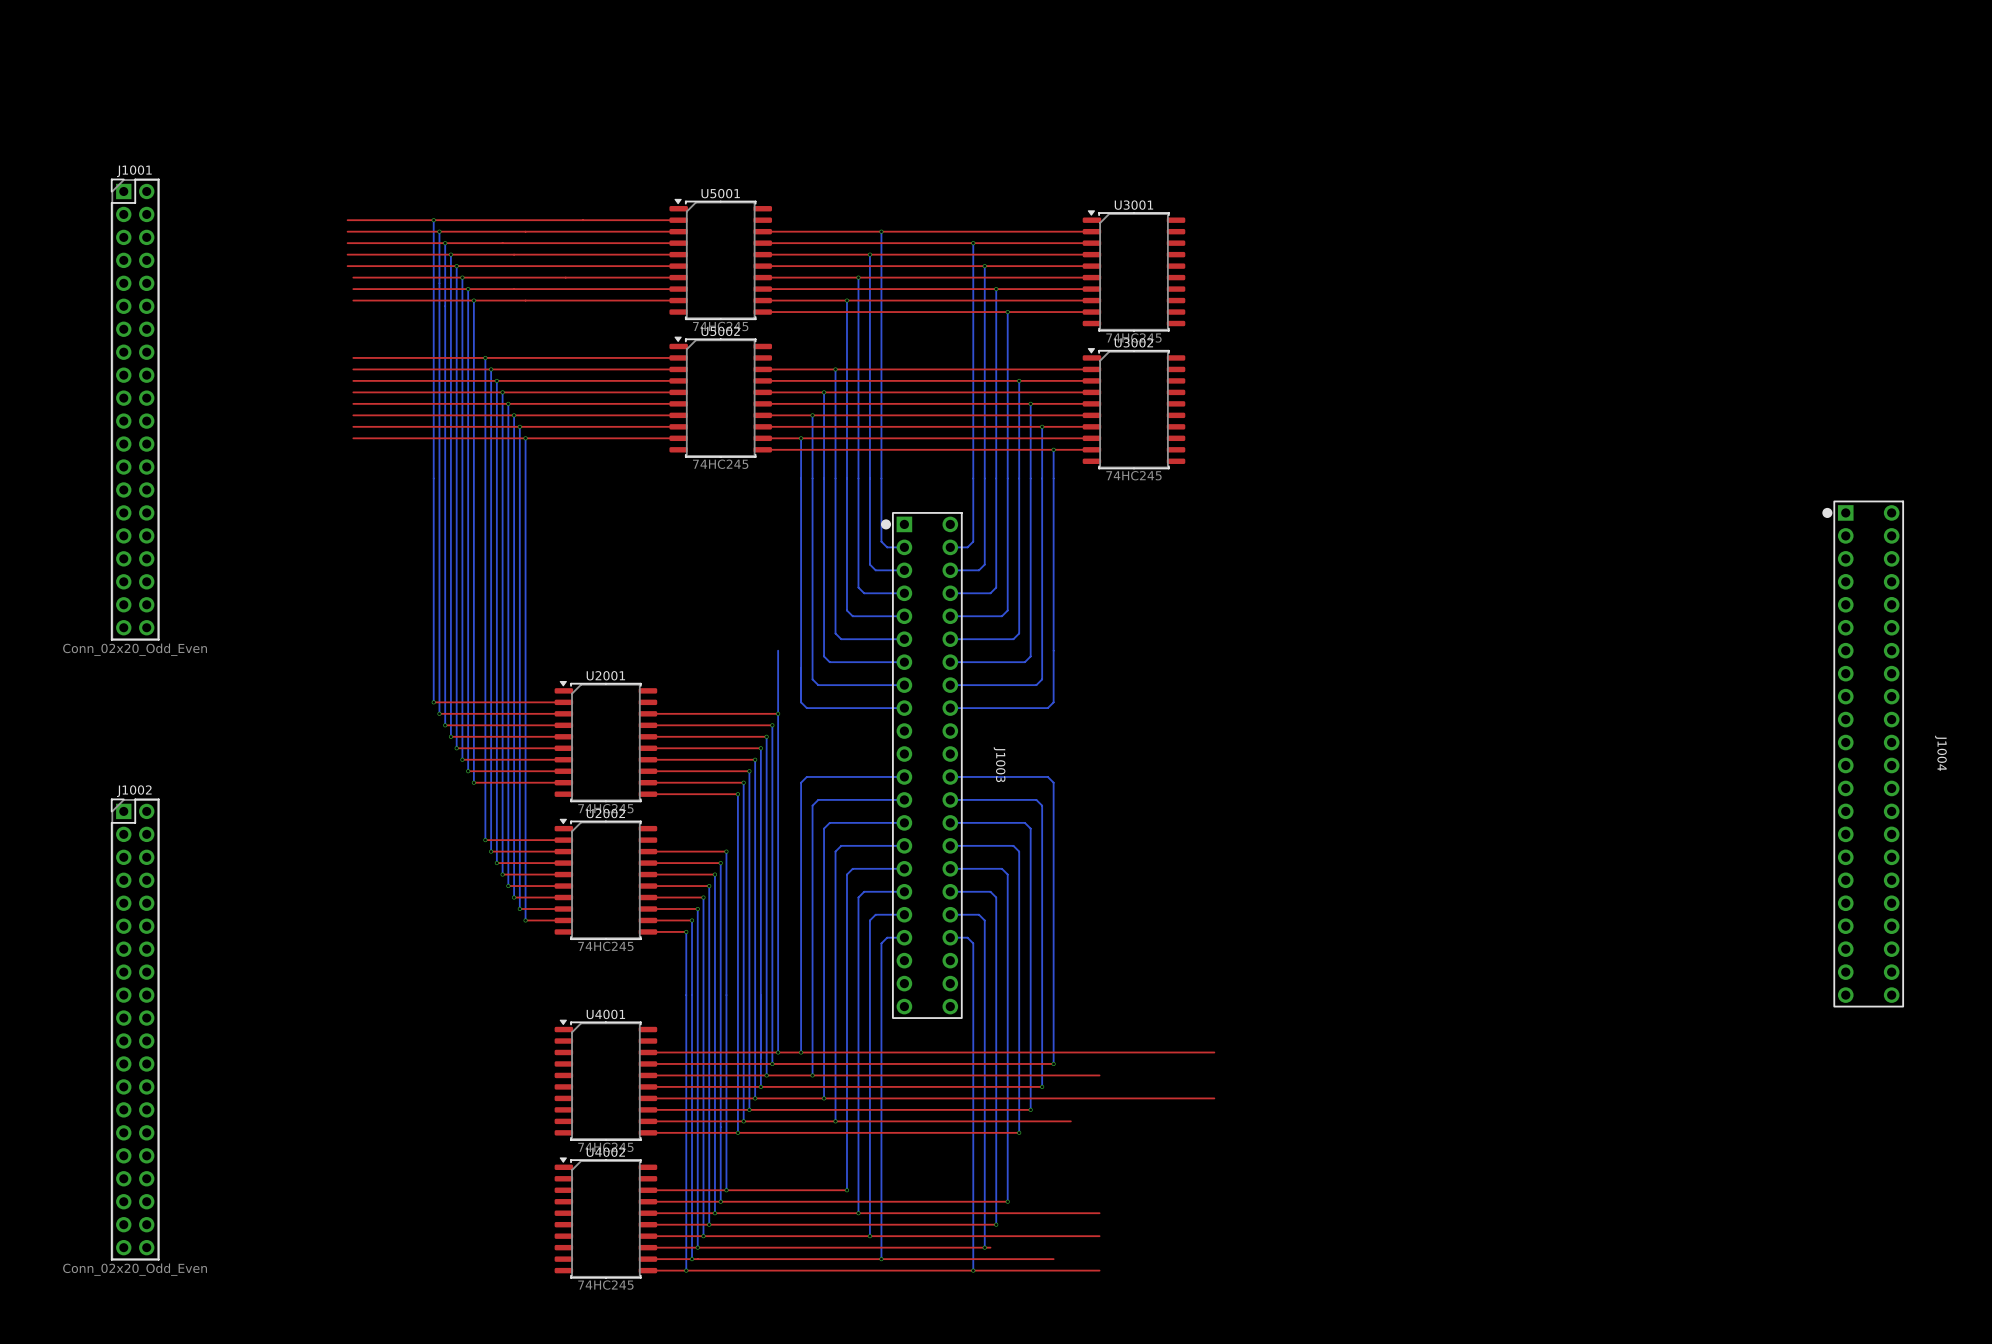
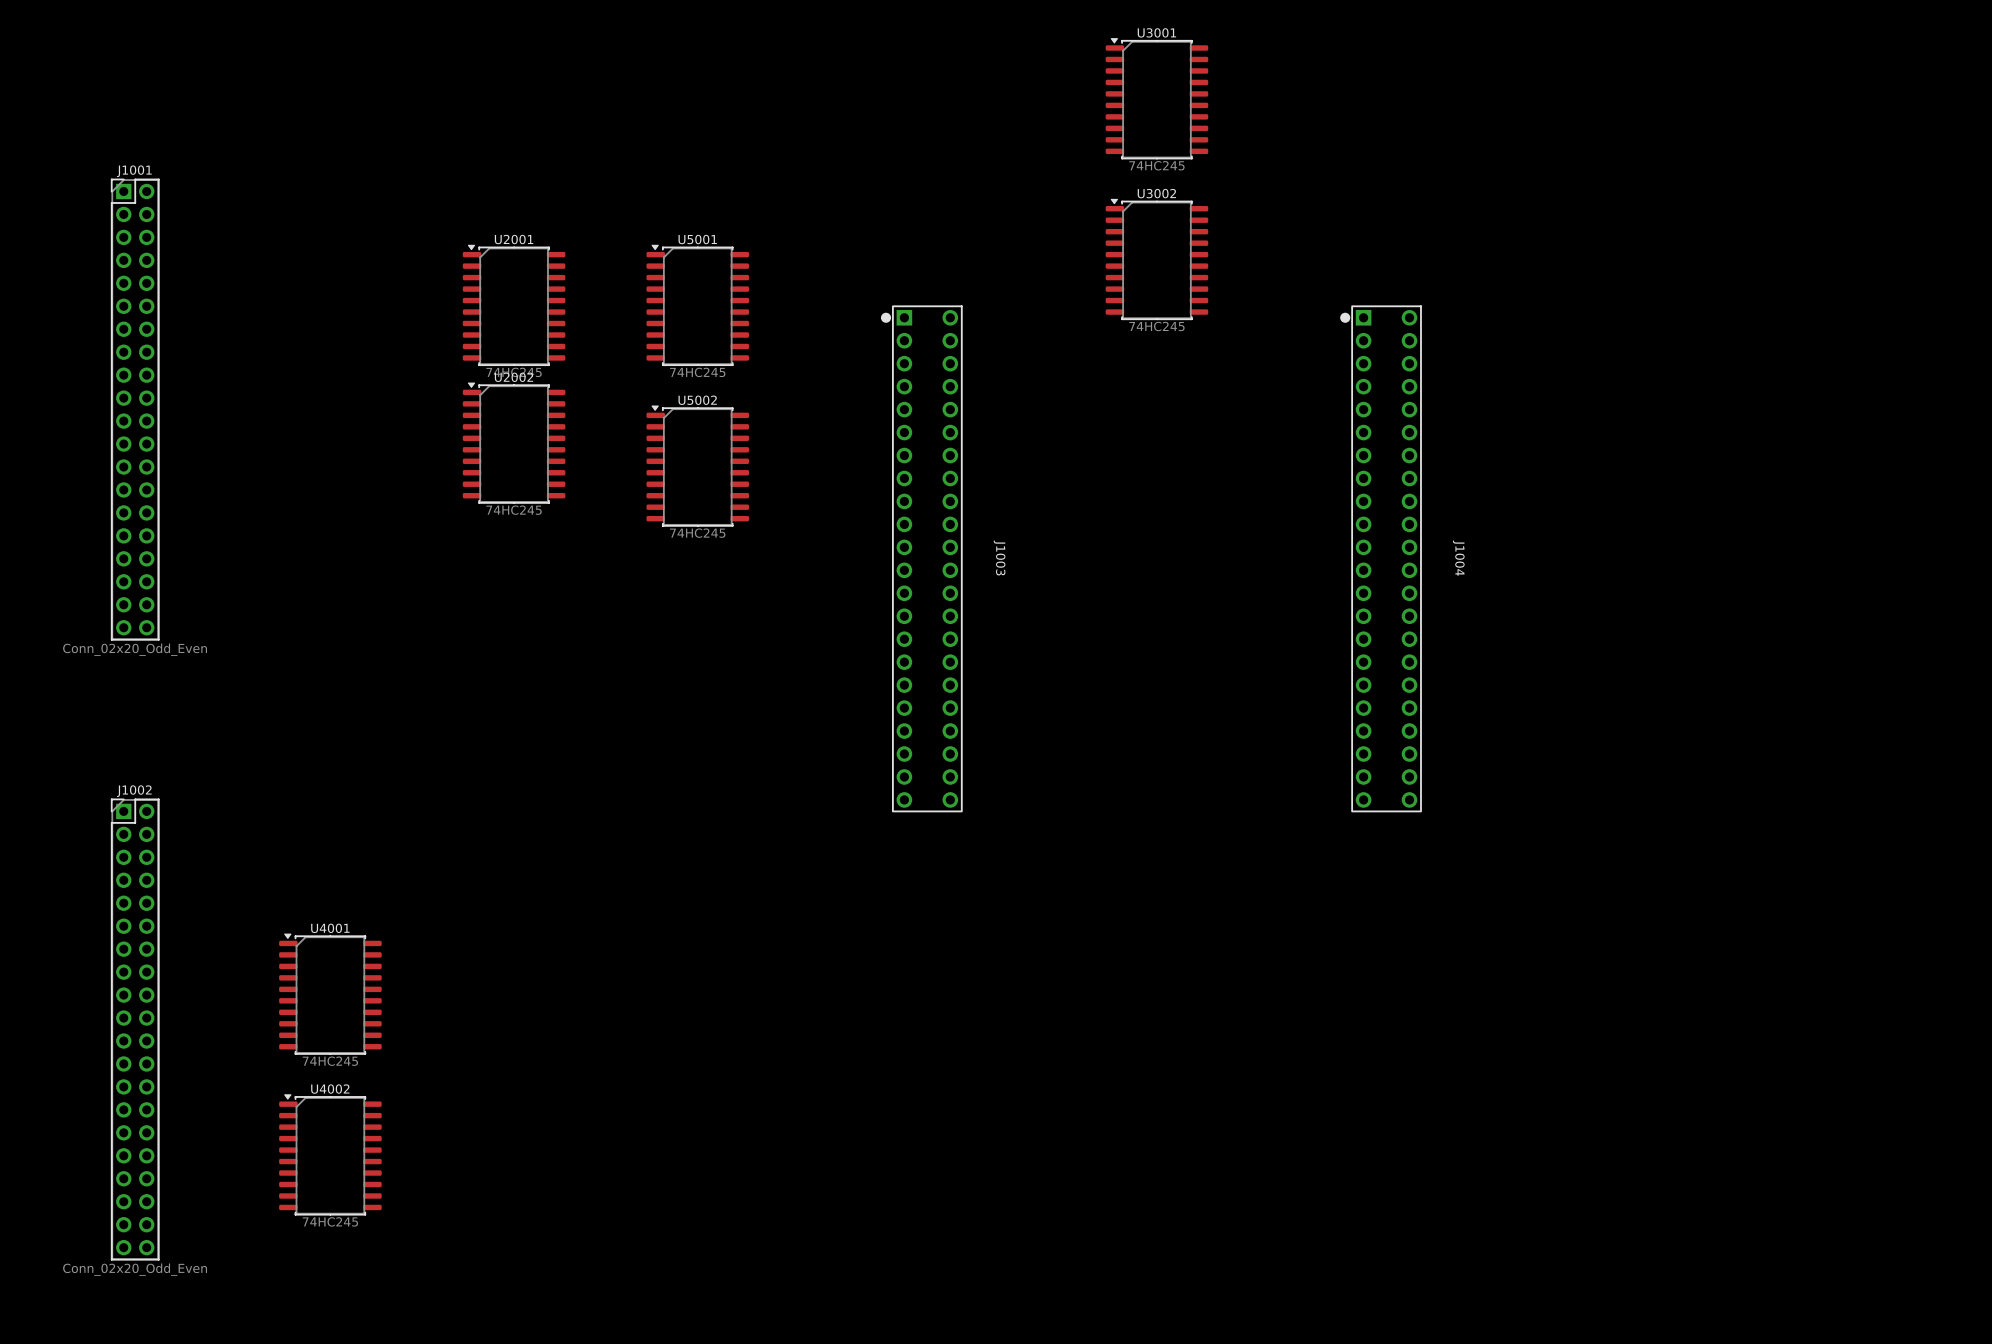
top track: (347, 220) (678, 220) -> none
bottom track: (433, 220) (433, 702) -> none
via: (433, 220) -> none
top track: (347, 231) (678, 231) -> none
bottom track: (439, 231) (439, 713) -> none
via: (439, 231) -> none
top track: (762, 231) (1091, 231) -> none
bottom track: (881, 231) (881, 541) (887, 547) (904, 547) -> none
via: (881, 231) -> none
top track: (347, 243) (678, 243) -> none
bottom track: (445, 243) (445, 725) -> none
via: (445, 243) -> none
top track: (762, 243) (1091, 243) -> none
bottom track: (973, 243) (973, 541) (967, 547) (950, 547) -> none
via: (973, 243) -> none
top track: (347, 254) (678, 254) -> none
bottom track: (450, 254) (450, 736) -> none
via: (450, 254) -> none
top track: (762, 254) (1091, 254) -> none
bottom track: (869, 254) (869, 564) (875, 570) (904, 570) -> none
via: (869, 254) -> none
U5001 position: (720, 259) -> (697, 305)
top track: (347, 266) (678, 266) -> none
bottom track: (456, 266) (456, 748) -> none
via: (456, 266) -> none
top track: (762, 266) (1091, 266) -> none
bottom track: (984, 266) (984, 564) (979, 570) (950, 570) -> none
via: (984, 266) -> none
U3001 position: (1133, 270) -> (1156, 98)
top track: (353, 277) (678, 277) -> none
bottom track: (462, 277) (462, 759) -> none
via: (462, 277) -> none
top track: (762, 277) (1091, 277) -> none
bottom track: (858, 277) (858, 587) (864, 593) (904, 593) -> none
via: (858, 277) -> none
top track: (353, 289) (678, 289) -> none
bottom track: (468, 289) (468, 771) -> none
via: (468, 289) -> none
top track: (762, 289) (1091, 289) -> none
bottom track: (996, 289) (996, 587) (990, 593) (950, 593) -> none
via: (996, 289) -> none
top track: (353, 300) (678, 300) -> none
bottom track: (473, 300) (473, 782) -> none
via: (473, 300) -> none
top track: (762, 300) (1091, 300) -> none
bottom track: (846, 300) (846, 610) (852, 616) (904, 616) -> none
via: (846, 300) -> none
top track: (762, 312) (1091, 312) -> none
bottom track: (1007, 312) (1007, 610) (1001, 616) (950, 616) -> none
via: (1007, 312) -> none
top track: (353, 357) (678, 357) -> none
bottom track: (485, 357) (485, 840) -> none
via: (485, 357) -> none
top track: (353, 369) (678, 369) -> none
bottom track: (491, 369) (491, 851) -> none
via: (491, 369) -> none
top track: (762, 369) (1091, 369) -> none
bottom track: (835, 369) (835, 633) (841, 639) (904, 639) -> none
via: (835, 369) -> none
top track: (353, 380) (678, 380) -> none
bottom track: (496, 380) (496, 863) -> none
via: (496, 380) -> none
top track: (762, 380) (1091, 380) -> none
bottom track: (1019, 380) (1019, 633) (1013, 639) (950, 639) -> none
via: (1019, 380) -> none
top track: (353, 392) (678, 392) -> none
bottom track: (502, 392) (502, 874) -> none
via: (502, 392) -> none
top track: (762, 392) (1091, 392) -> none
bottom track: (824, 392) (824, 656) (829, 662) (904, 662) -> none
via: (824, 392) -> none
U5002 position: (720, 397) -> (697, 465)
top track: (353, 403) (678, 403) -> none
bottom track: (508, 403) (508, 886) -> none
via: (508, 403) -> none
top track: (762, 403) (1091, 403) -> none
bottom track: (1030, 403) (1030, 656) (1024, 662) (950, 662) -> none
via: (1030, 403) -> none
U3002 position: (1133, 408) -> (1156, 259)
top track: (353, 415) (678, 415) -> none
bottom track: (514, 415) (514, 897) -> none
via: (514, 415) -> none
top track: (762, 415) (1091, 415) -> none
bottom track: (812, 415) (812, 679) (818, 685) (904, 685) -> none
via: (812, 415) -> none
top track: (353, 426) (678, 426) -> none
bottom track: (519, 426) (519, 908) -> none
via: (519, 426) -> none
top track: (762, 426) (1091, 426) -> none
bottom track: (1042, 426) (1042, 679) (1036, 685) (950, 685) -> none
via: (1042, 426) -> none
top track: (353, 438) (678, 438) -> none
bottom track: (525, 438) (525, 920) -> none
via: (525, 438) -> none
top track: (762, 438) (1091, 438) -> none
bottom track: (801, 438) (801, 702) (806, 708) (904, 708) -> none
via: (801, 438) -> none
top track: (762, 449) (1091, 449) -> none
bottom track: (1053, 449) (1053, 702) (1047, 708) (950, 708) -> none
via: (1053, 449) -> none
bottom track: (778, 650) (778, 1052) -> none
top track: (433, 702) (563, 702) -> none
via: (433, 702) -> none
top track: (439, 713) (563, 713) -> none
via: (439, 713) -> none
top track: (647, 713) (778, 713) -> none
via: (778, 713) -> none
top track: (445, 725) (563, 725) -> none
via: (445, 725) -> none
top track: (647, 725) (772, 725) -> none
bottom track: (772, 725) (772, 1063) -> none
via: (772, 725) -> none
top track: (450, 736) (563, 736) -> none
via: (450, 736) -> none
top track: (647, 736) (766, 736) -> none
bottom track: (766, 736) (766, 1075) -> none
via: (766, 736) -> none
U2001 position: (605, 741) -> (514, 305)
top track: (456, 748) (563, 748) -> none
via: (456, 748) -> none
top track: (647, 748) (760, 748) -> none
bottom track: (760, 748) (760, 1086) -> none
via: (760, 748) -> none
J1004 position: (1862, 754) -> (1380, 558)
top track: (462, 759) (563, 759) -> none
via: (462, 759) -> none
top track: (647, 759) (755, 759) -> none
bottom track: (755, 759) (755, 1098) -> none
via: (755, 759) -> none
J1003 position: (921, 765) -> (921, 558)
top track: (468, 771) (563, 771) -> none
via: (468, 771) -> none
top track: (647, 771) (749, 771) -> none
bottom track: (749, 771) (749, 1109) -> none
via: (749, 771) -> none
bottom track: (904, 776) (806, 776) (801, 782) (801, 1052) -> none
bottom track: (950, 776) (1047, 776) (1053, 782) (1053, 1063) -> none
top track: (473, 782) (563, 782) -> none
via: (473, 782) -> none
top track: (647, 782) (743, 782) -> none
bottom track: (743, 782) (743, 1121) -> none
via: (743, 782) -> none
top track: (647, 794) (737, 794) -> none
bottom track: (737, 794) (737, 1132) -> none
via: (737, 794) -> none
bottom track: (904, 799) (818, 799) (812, 805) (812, 1075) -> none
bottom track: (950, 799) (1036, 799) (1042, 805) (1042, 1086) -> none
bottom track: (904, 822) (829, 822) (824, 828) (824, 1098) -> none
bottom track: (950, 822) (1024, 822) (1030, 828) (1030, 1109) -> none
top track: (485, 840) (563, 840) -> none
via: (485, 840) -> none
bottom track: (904, 845) (841, 845) (835, 851) (835, 1121) -> none
bottom track: (950, 845) (1013, 845) (1019, 851) (1019, 1132) -> none
top track: (491, 851) (563, 851) -> none
via: (491, 851) -> none
top track: (647, 851) (726, 851) -> none
bottom track: (726, 851) (726, 1190) -> none
via: (726, 851) -> none
top track: (496, 863) (563, 863) -> none
via: (496, 863) -> none
top track: (647, 863) (720, 863) -> none
bottom track: (720, 863) (720, 1201) -> none
via: (720, 863) -> none
bottom track: (904, 868) (852, 868) (846, 874) (846, 1190) -> none
bottom track: (950, 868) (1001, 868) (1007, 874) (1007, 1201) -> none
top track: (502, 874) (563, 874) -> none
via: (502, 874) -> none
top track: (647, 874) (714, 874) -> none
bottom track: (714, 874) (714, 1213) -> none
via: (714, 874) -> none
U2002 position: (605, 879) -> (514, 442)
top track: (508, 886) (563, 886) -> none
via: (508, 886) -> none
top track: (647, 886) (709, 886) -> none
bottom track: (709, 886) (709, 1224) -> none
via: (709, 886) -> none
bottom track: (904, 891) (864, 891) (858, 897) (858, 1213) -> none
bottom track: (950, 891) (990, 891) (996, 897) (996, 1224) -> none
top track: (514, 897) (563, 897) -> none
via: (514, 897) -> none
top track: (647, 897) (703, 897) -> none
bottom track: (703, 897) (703, 1236) -> none
via: (703, 897) -> none
top track: (519, 908) (563, 908) -> none
via: (519, 908) -> none
top track: (647, 908) (697, 908) -> none
bottom track: (697, 908) (697, 1247) -> none
via: (697, 908) -> none
bottom track: (904, 914) (875, 914) (869, 920) (869, 1236) -> none
bottom track: (950, 914) (979, 914) (984, 920) (984, 1247) -> none
top track: (525, 920) (563, 920) -> none
via: (525, 920) -> none
top track: (647, 920) (692, 920) -> none
bottom track: (692, 920) (692, 1259) -> none
via: (692, 920) -> none
top track: (647, 931) (686, 931) -> none
bottom track: (686, 931) (686, 1270) -> none
via: (686, 931) -> none
bottom track: (904, 937) (887, 937) (881, 943) (881, 1259) -> none
bottom track: (950, 937) (967, 937) (973, 943) (973, 1270) -> none
top track: (647, 1052) (1214, 1052) -> none
via: (778, 1052) -> none
via: (801, 1052) -> none
top track: (647, 1063) (1053, 1063) -> none
via: (772, 1063) -> none
via: (1053, 1063) -> none
top track: (647, 1075) (1099, 1075) -> none
via: (766, 1075) -> none
via: (812, 1075) -> none
U4001 position: (605, 1080) -> (330, 994)
top track: (647, 1086) (1042, 1086) -> none
via: (760, 1086) -> none
via: (1042, 1086) -> none
top track: (647, 1098) (1214, 1098) -> none
via: (755, 1098) -> none
via: (824, 1098) -> none
top track: (647, 1109) (1030, 1109) -> none
via: (749, 1109) -> none
via: (1030, 1109) -> none
top track: (647, 1121) (1070, 1121) -> none
via: (743, 1121) -> none
via: (835, 1121) -> none
top track: (647, 1132) (1019, 1132) -> none
via: (737, 1132) -> none
via: (1019, 1132) -> none
top track: (647, 1190) (846, 1190) -> none
via: (726, 1190) -> none
via: (846, 1190) -> none
top track: (647, 1201) (1007, 1201) -> none
via: (720, 1201) -> none
via: (1007, 1201) -> none
top track: (647, 1213) (1099, 1213) -> none
via: (714, 1213) -> none
via: (858, 1213) -> none
U4002 position: (605, 1217) -> (330, 1154)
top track: (647, 1224) (996, 1224) -> none
via: (709, 1224) -> none
via: (996, 1224) -> none
top track: (647, 1236) (1099, 1236) -> none
via: (703, 1236) -> none
via: (869, 1236) -> none
top track: (647, 1247) (990, 1247) -> none
via: (697, 1247) -> none
via: (984, 1247) -> none
top track: (647, 1259) (1053, 1259) -> none
via: (692, 1259) -> none
via: (881, 1259) -> none
top track: (647, 1270) (1099, 1270) -> none
via: (686, 1270) -> none
via: (973, 1270) -> none

